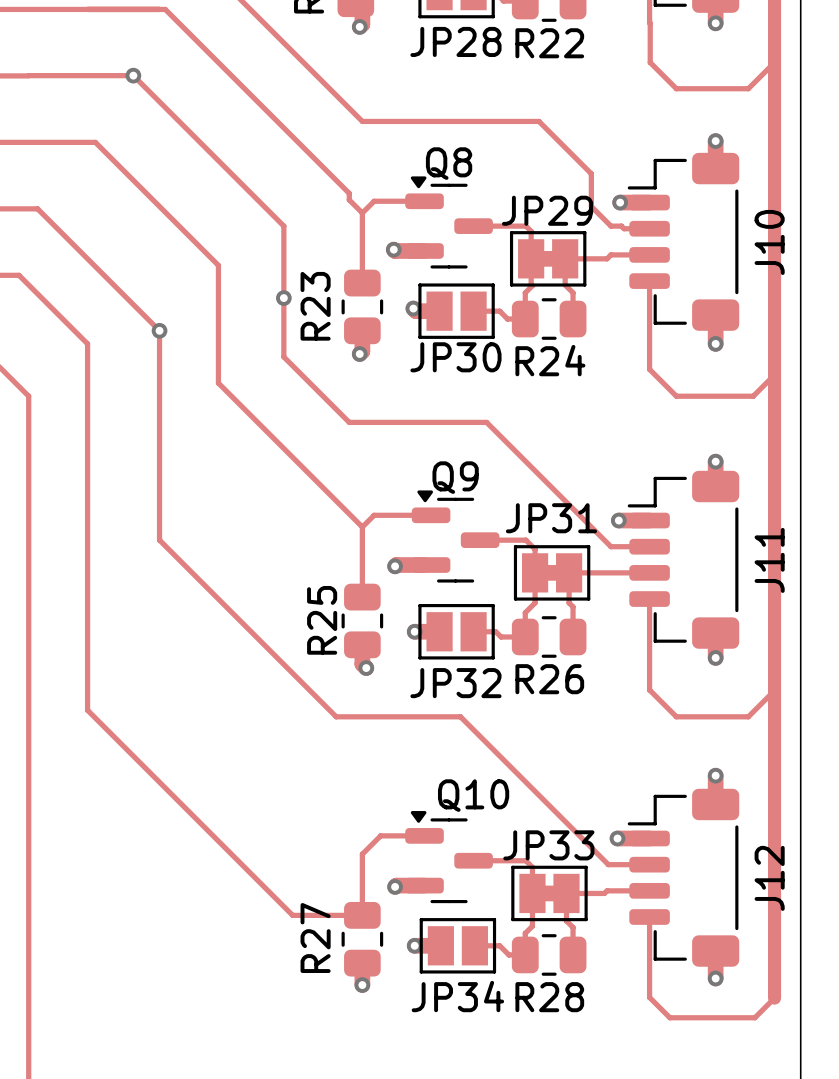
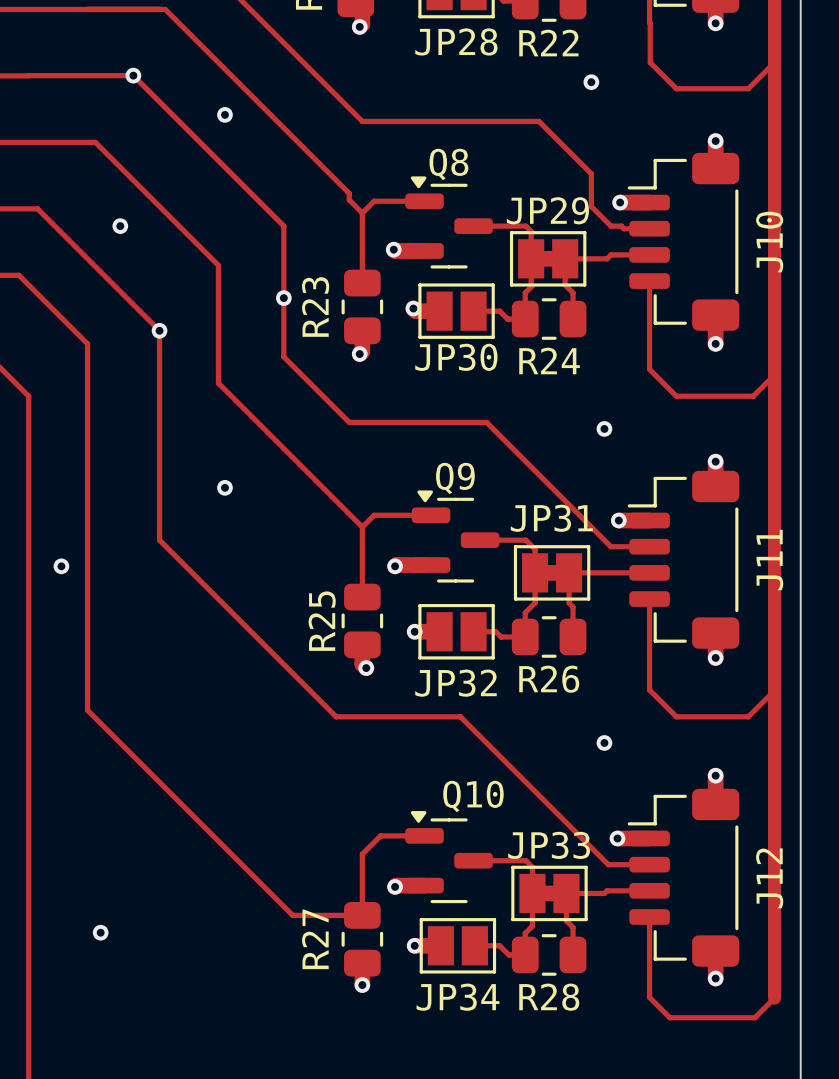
via: none -> (591, 82)
via: none -> (224, 114)
via: none -> (120, 226)
via: none -> (604, 428)
via: none -> (224, 487)
via: none -> (61, 566)
via: none -> (604, 742)
via: none -> (100, 932)

